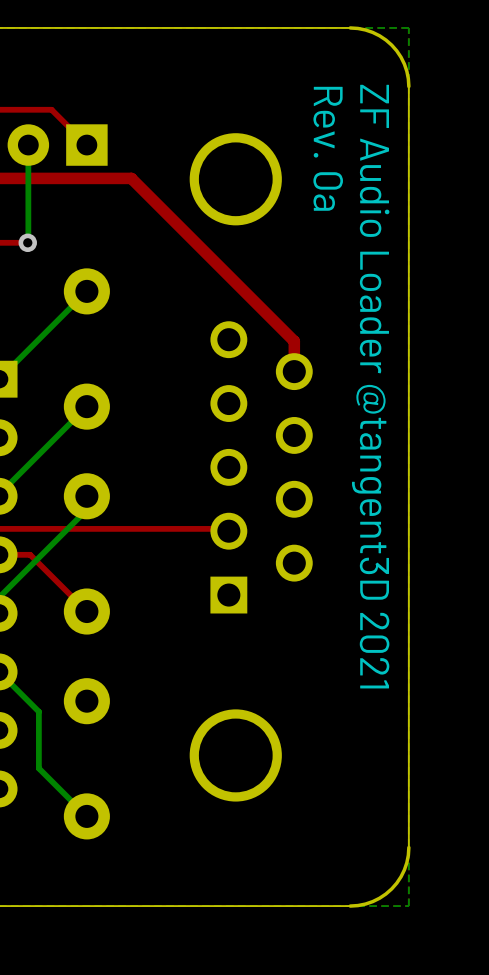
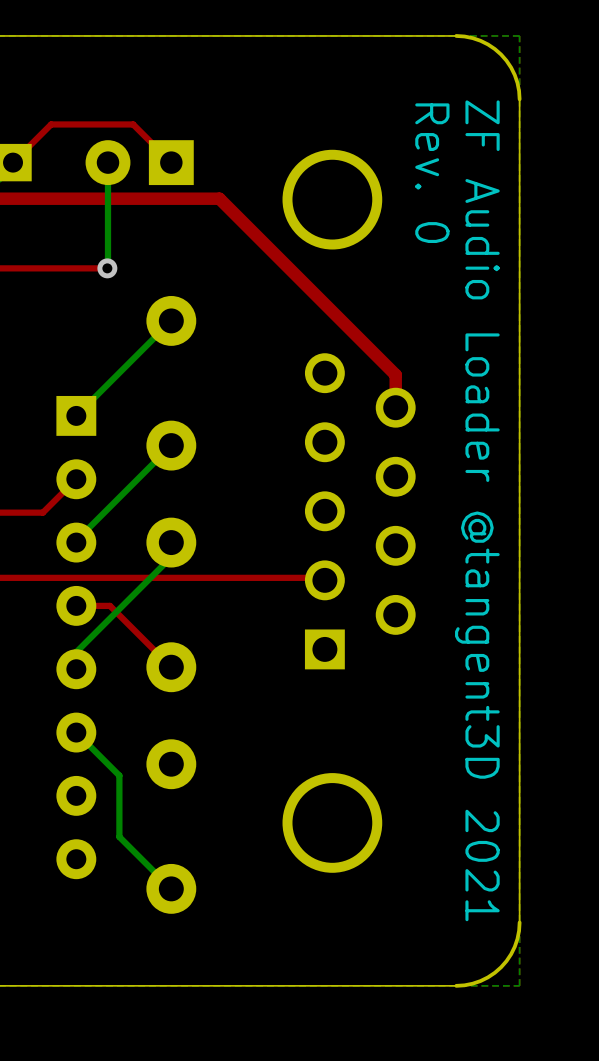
text: Rev. 0a (328, 148) -> Rev. 0 (432, 173)

